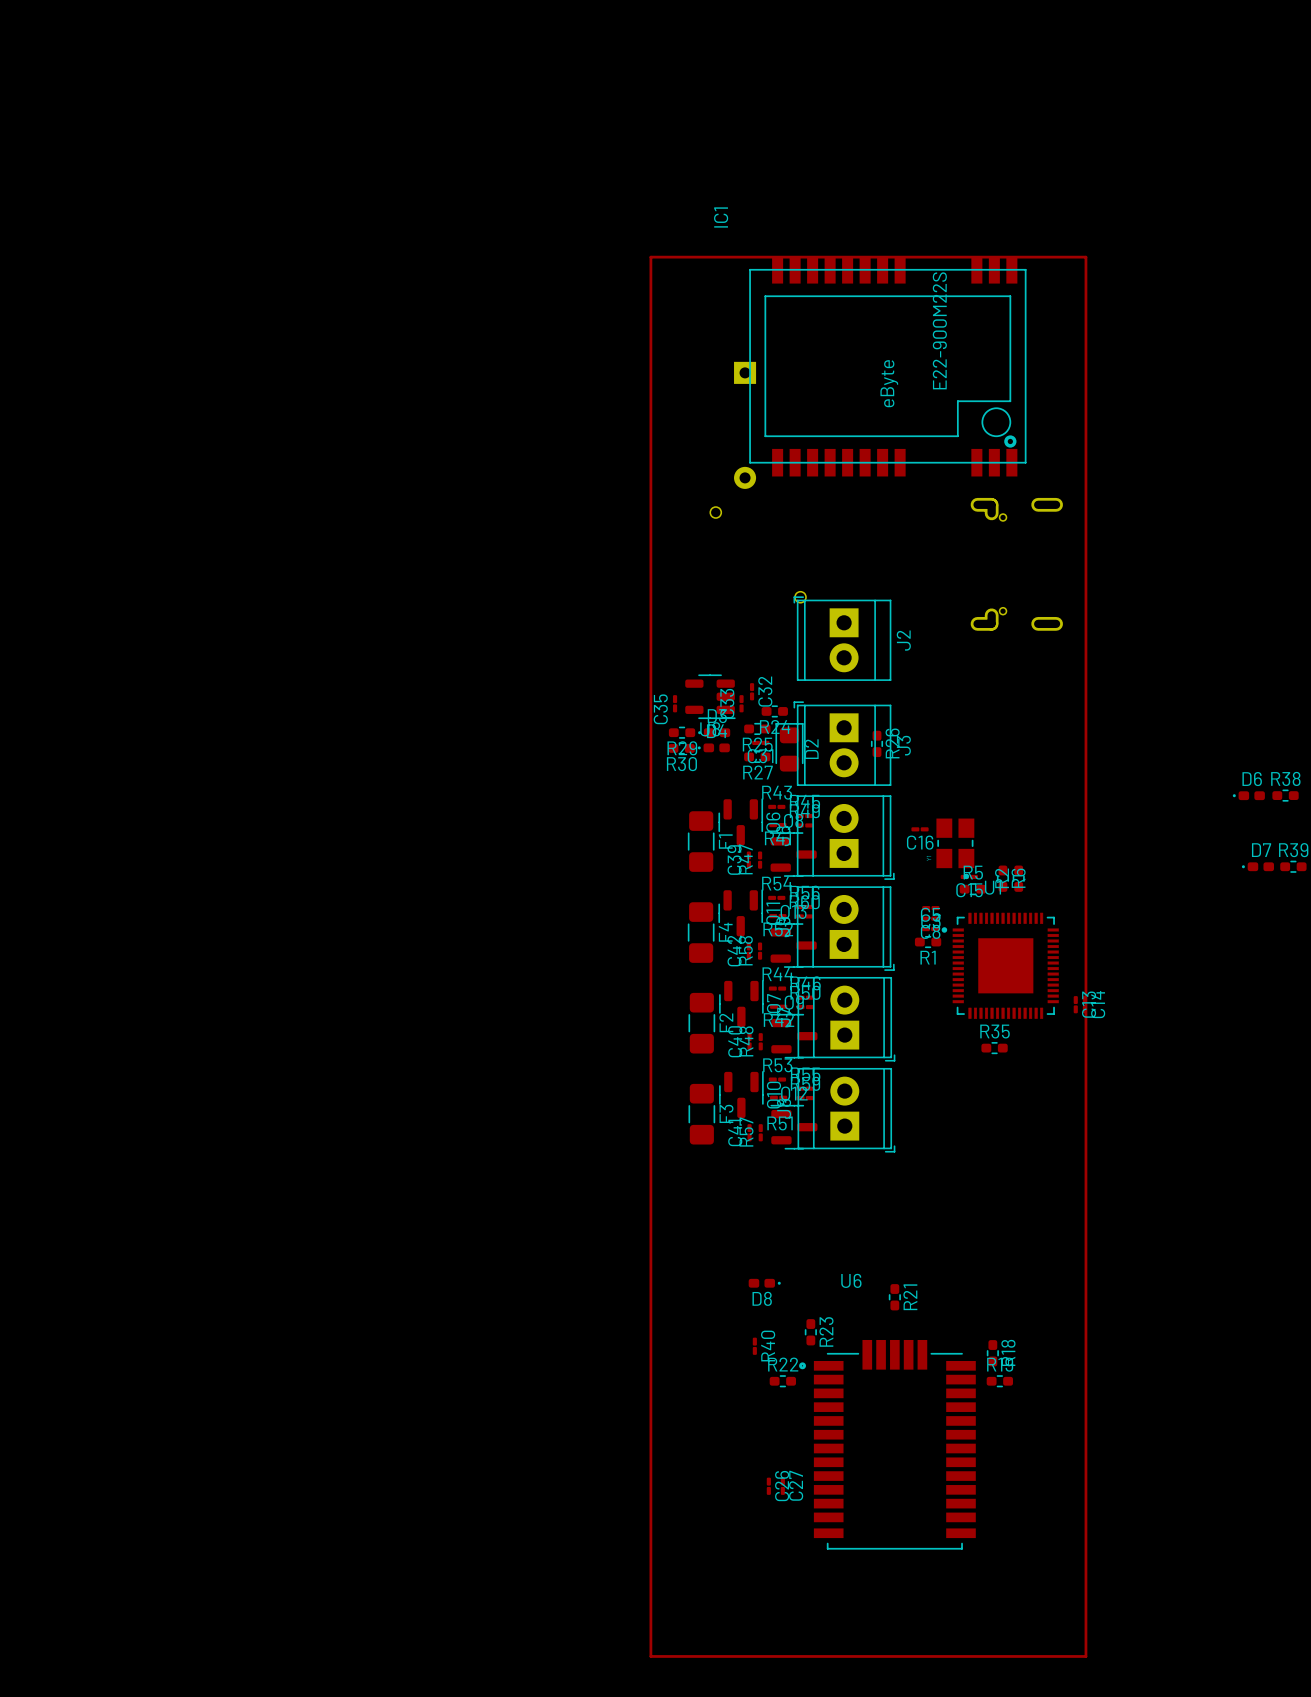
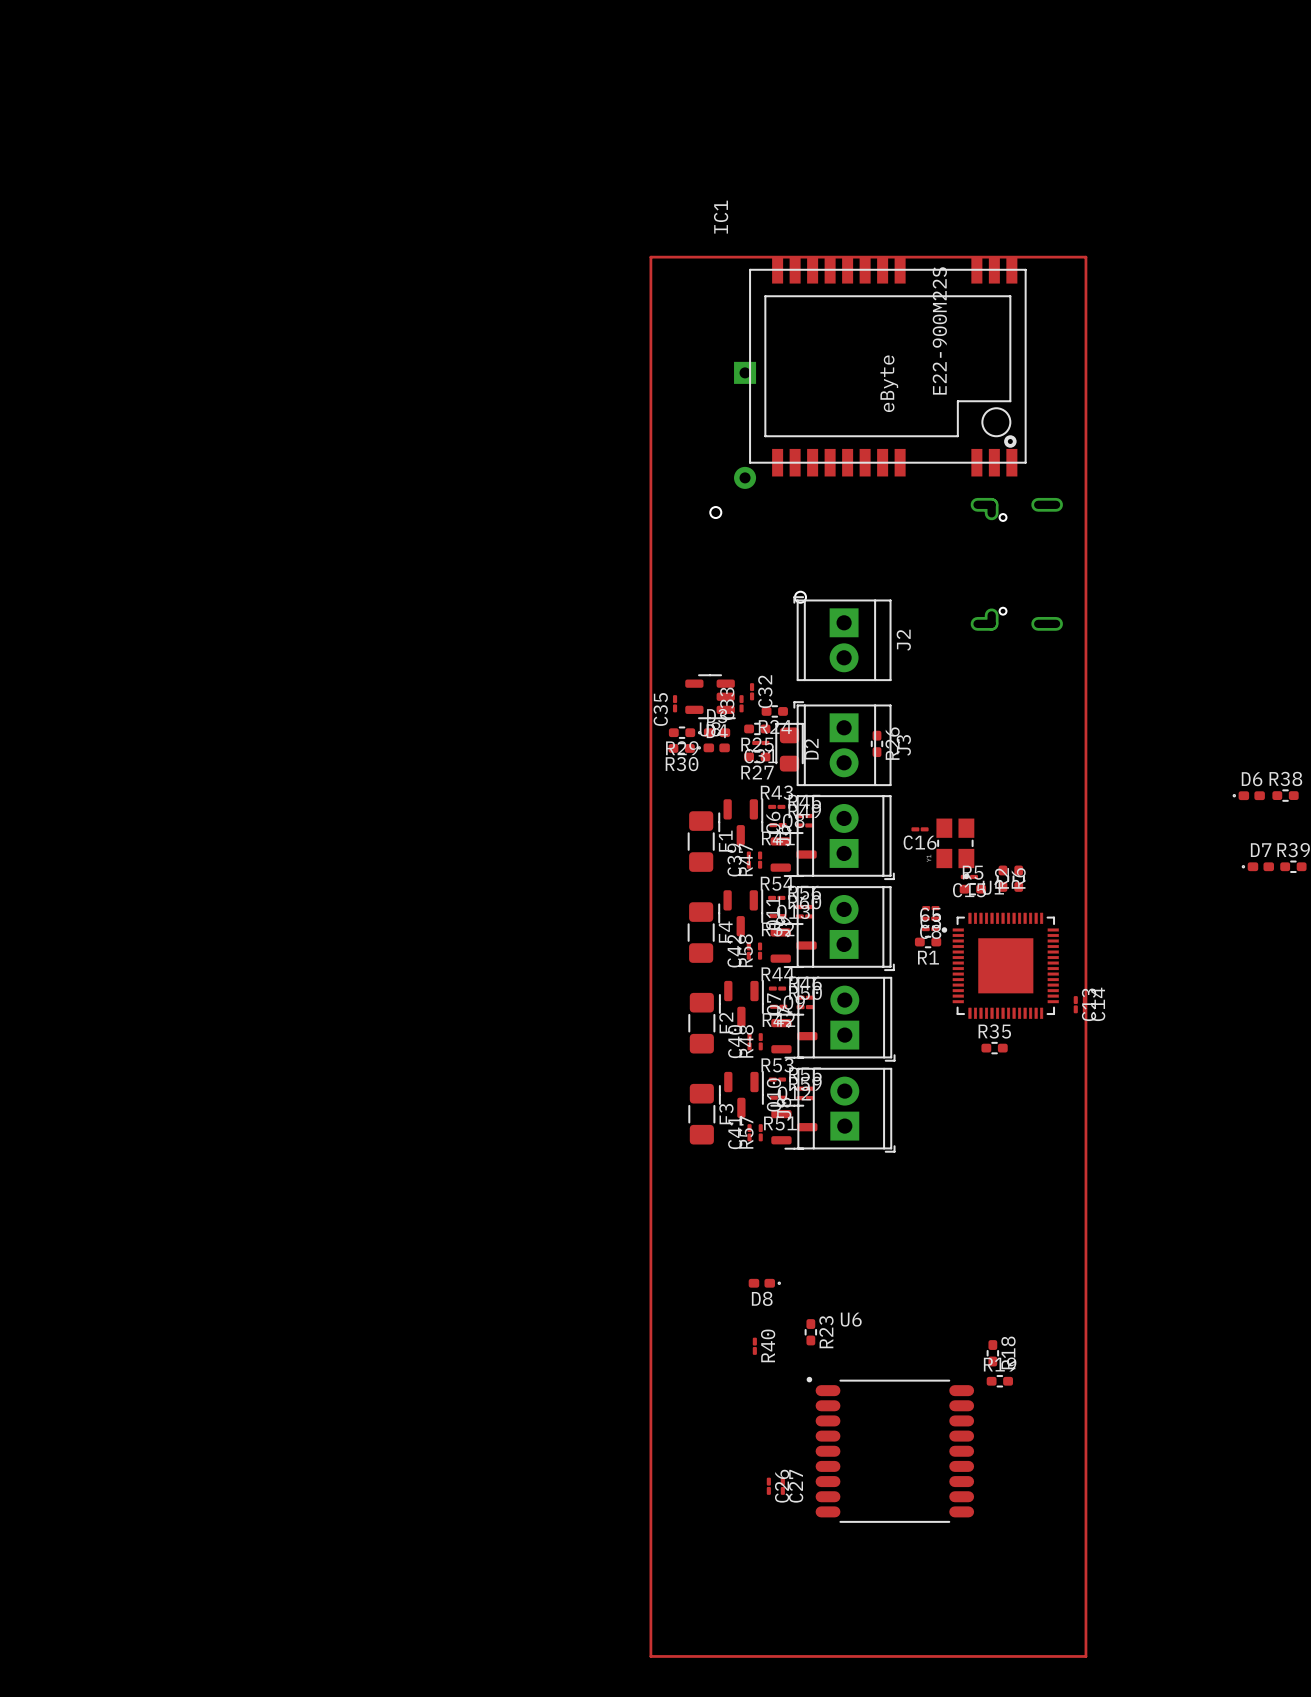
U6 name position: U6 (851, 1280) -> U6 (851, 1319)
R21: (894, 1297) -> none
U6 footprint: [799, 1339, 976, 1550] -> [806, 1376, 975, 1523]
R22: (782, 1381) -> none

